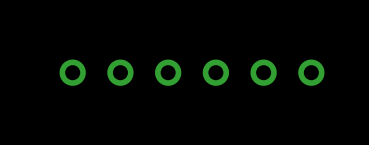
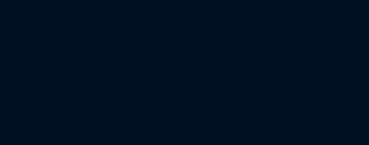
part: (72, 72) -> none
part: (120, 72) -> none
part: (168, 72) -> none
part: (215, 72) -> none
part: (263, 72) -> none
part: (311, 72) -> none

